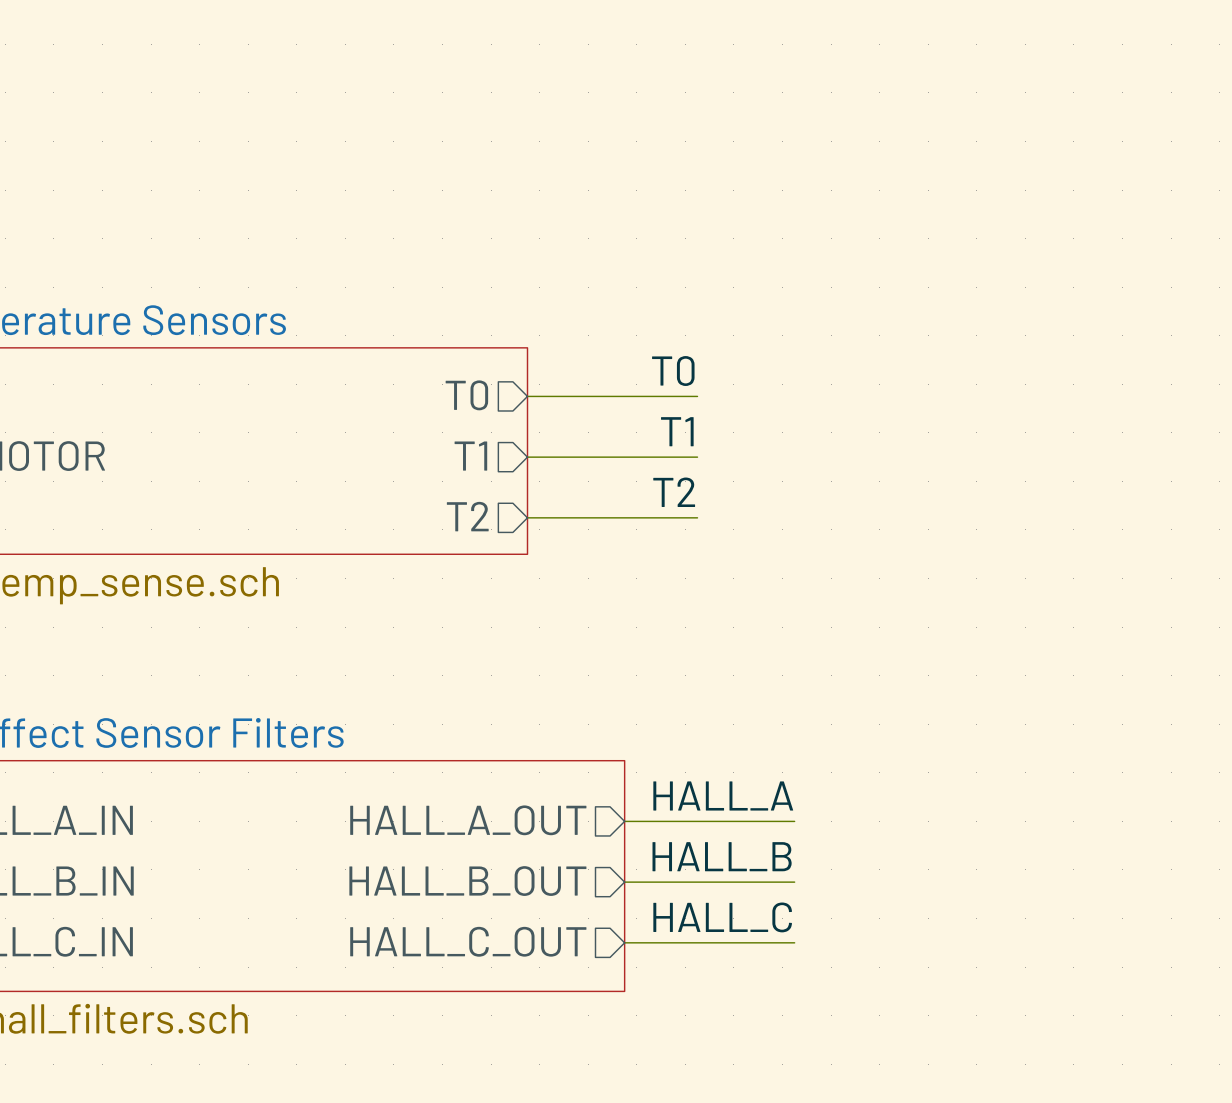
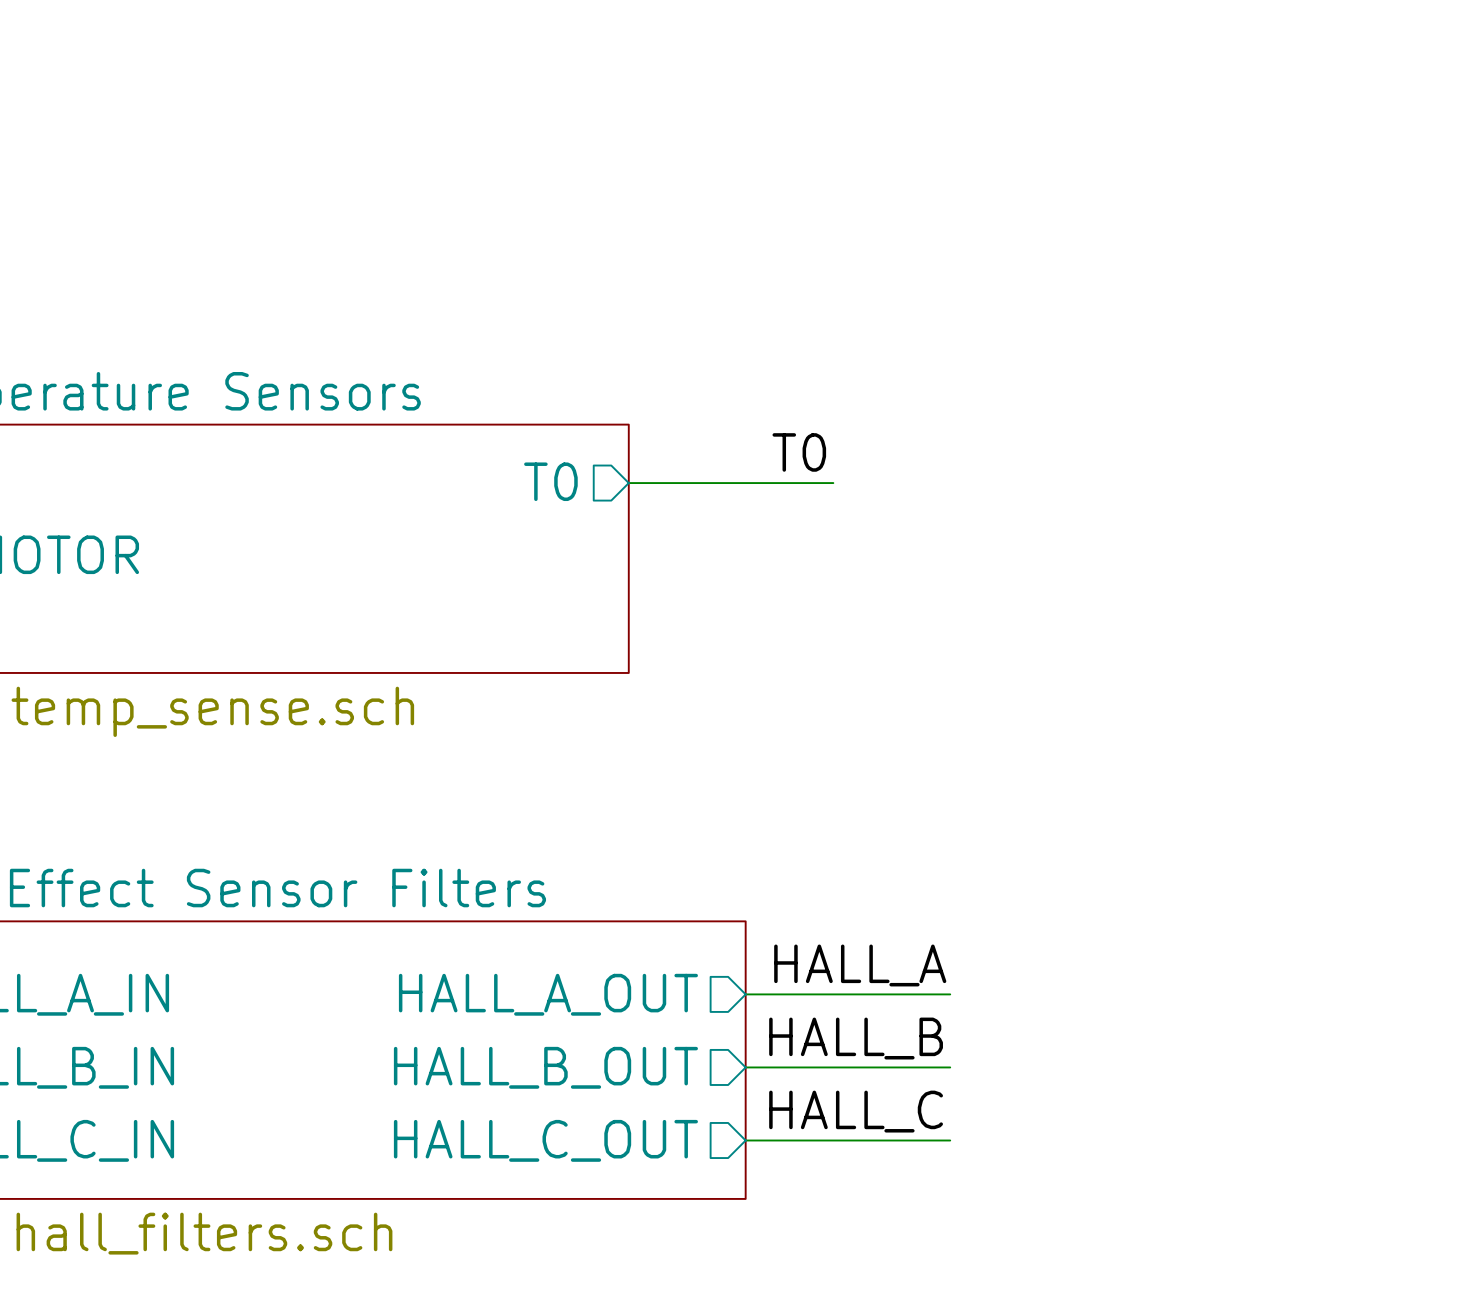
label: T1 (677, 431) -> none
sheet pin: T1 (470, 456) -> none
wire: (527, 457) (697, 457) -> none
label: T2 (674, 492) -> none
sheet pin: T2 (467, 516) -> none
wire: (527, 517) (697, 517) -> none

